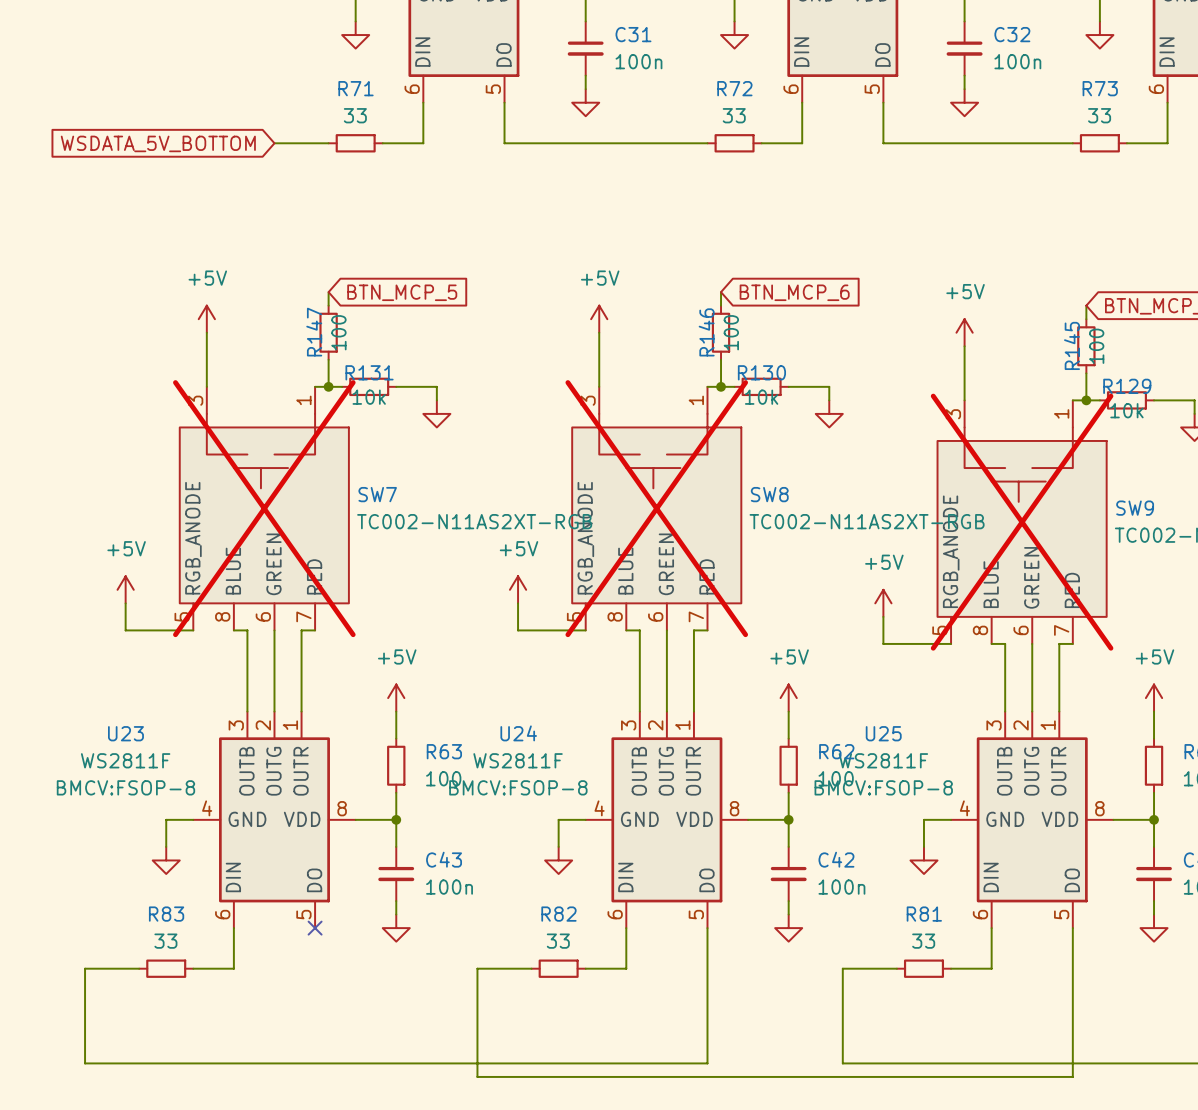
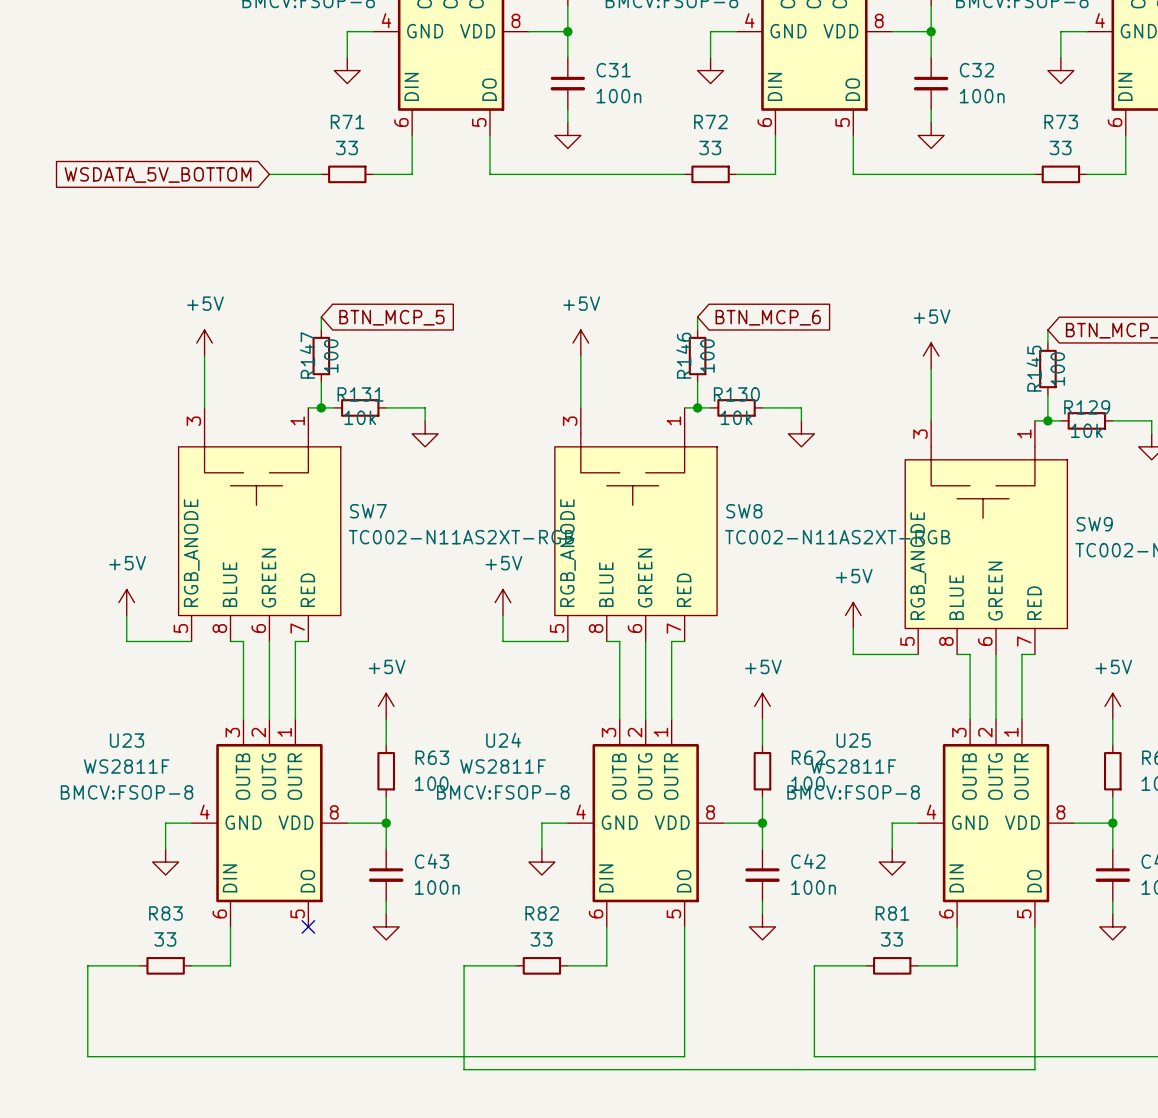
SW7 do-not-place cross: (264, 508) -> none
SW8 do-not-place cross: (656, 508) -> none
SW9 do-not-place cross: (1022, 522) -> none

